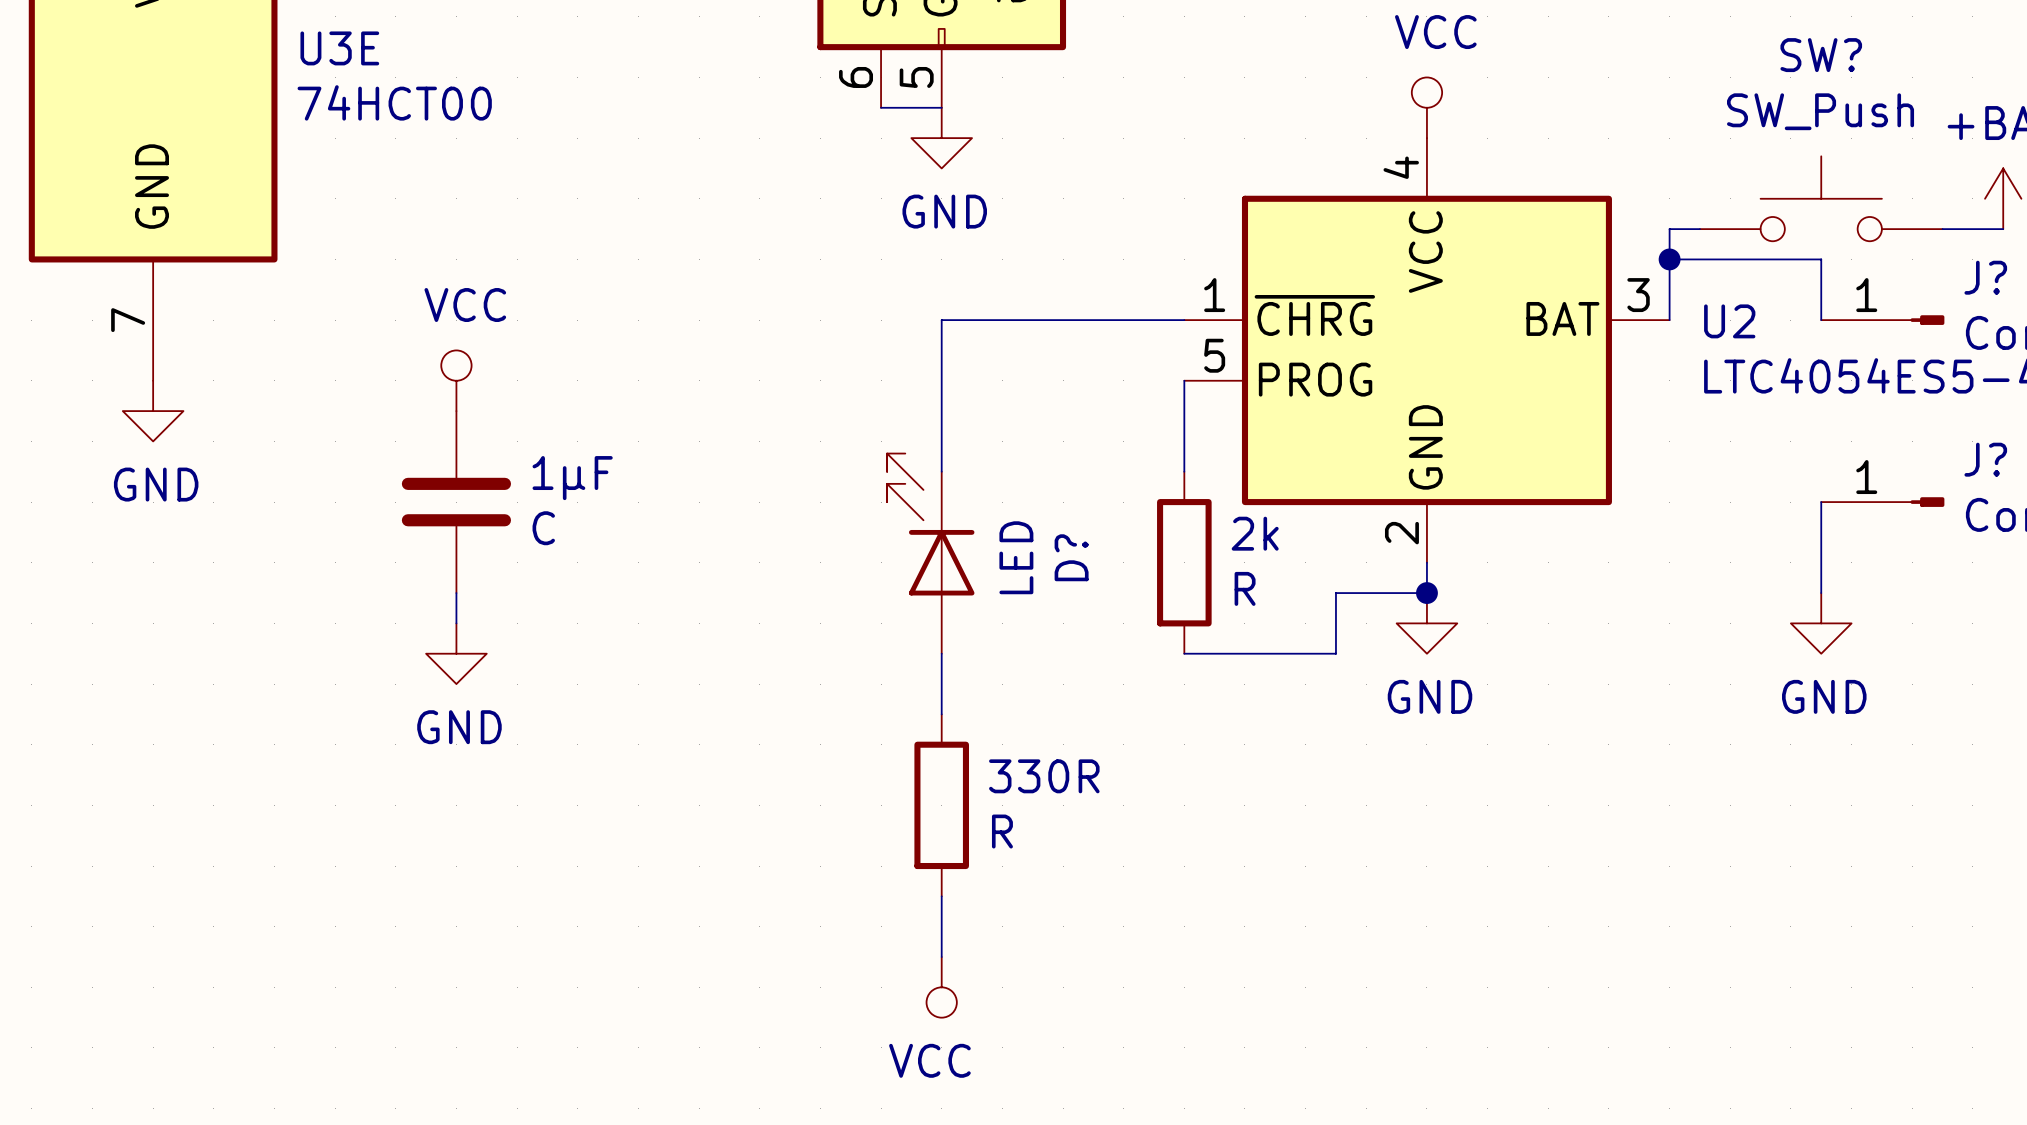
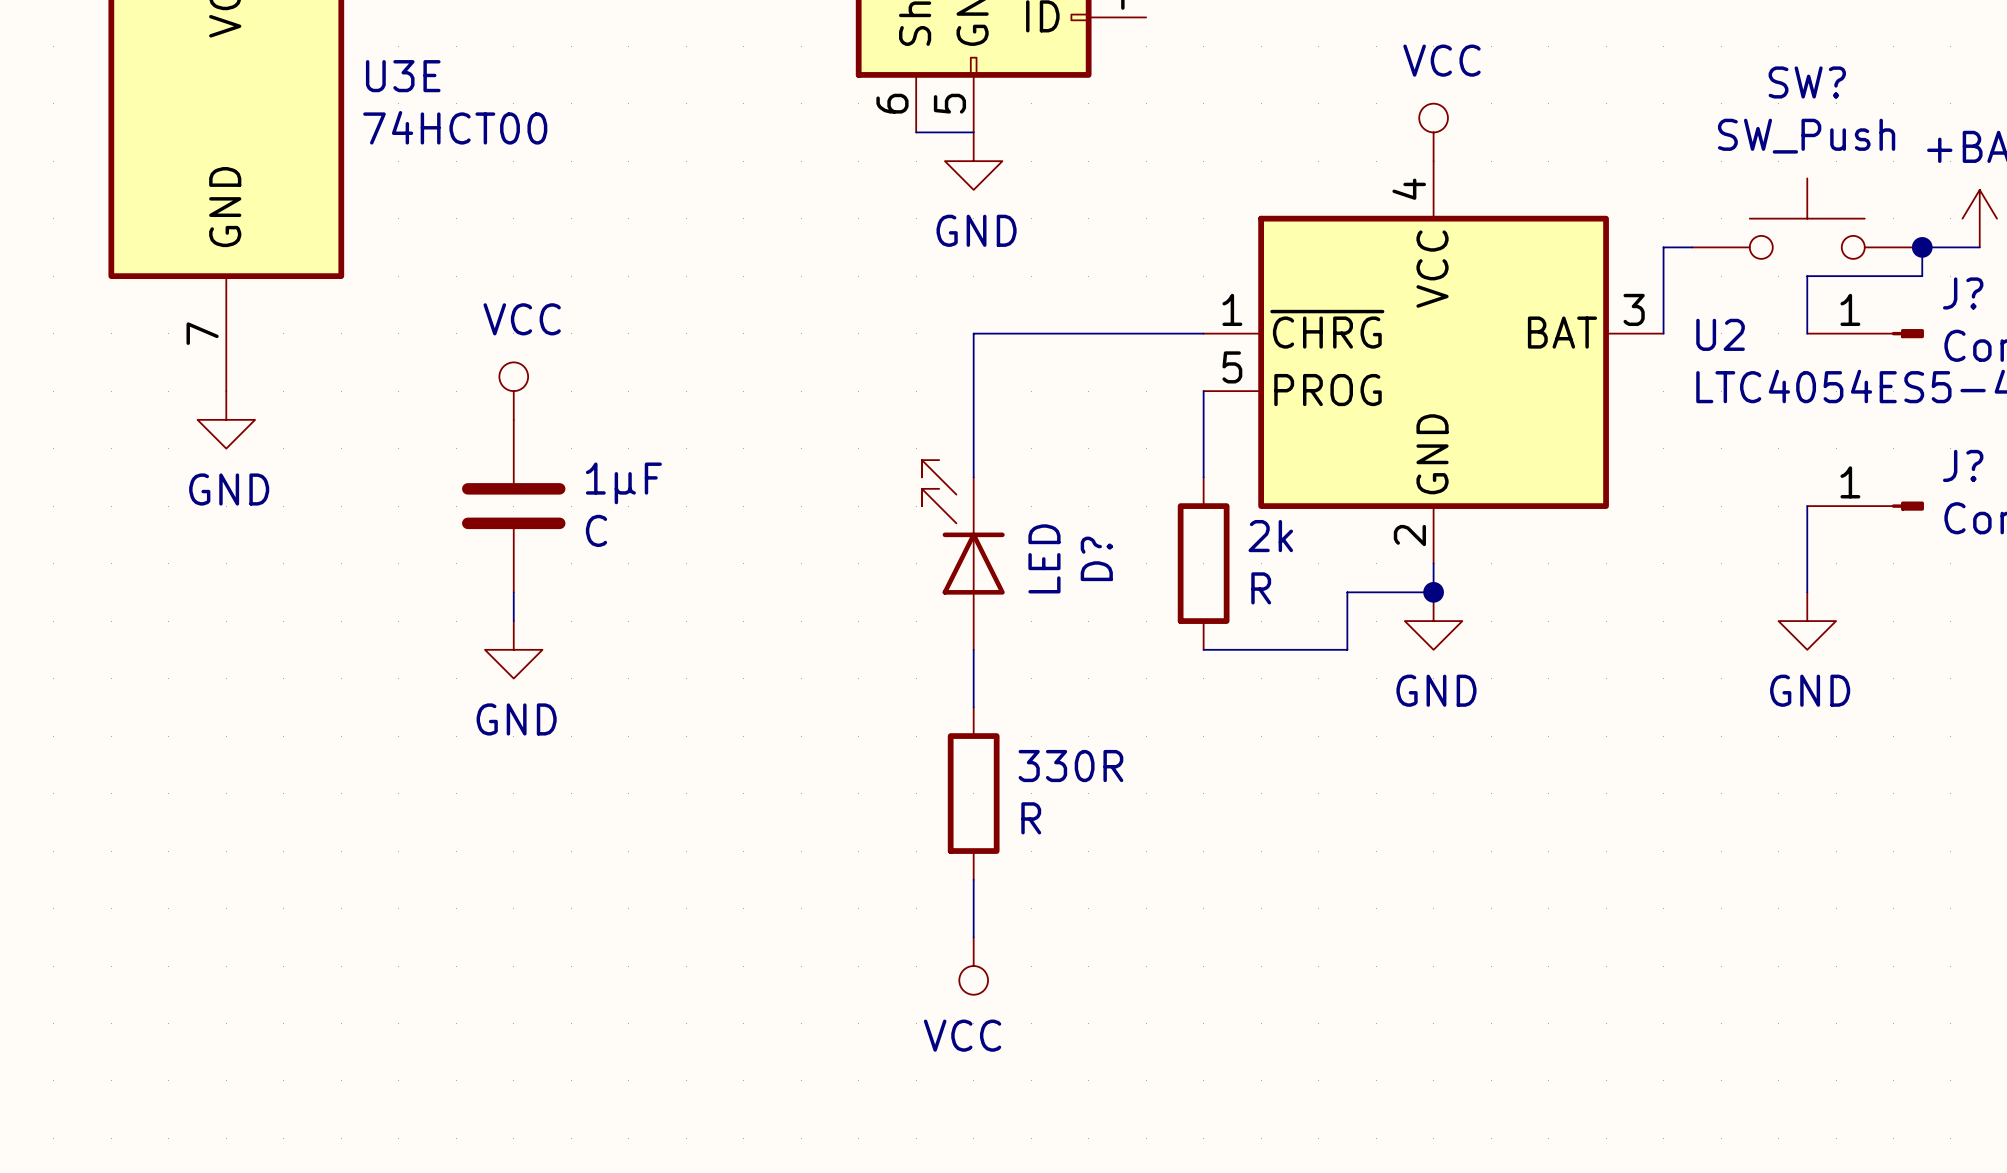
junction: none -> (1922, 247)
wire: (1669, 259) (1821, 259) -> (1922, 247) (1922, 276) (1807, 276)
junction: (1669, 259) -> none

